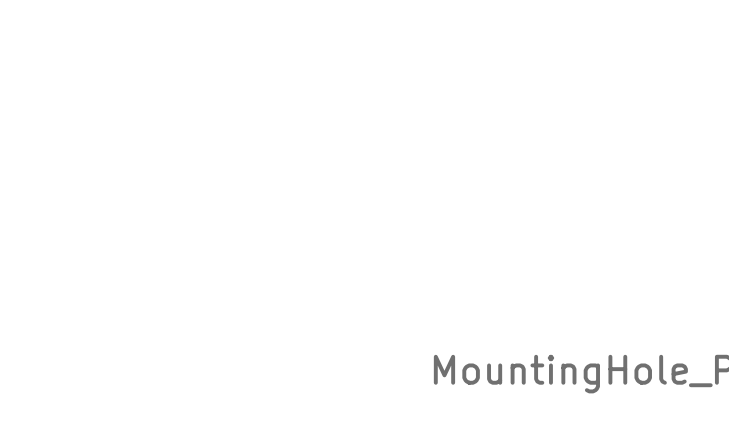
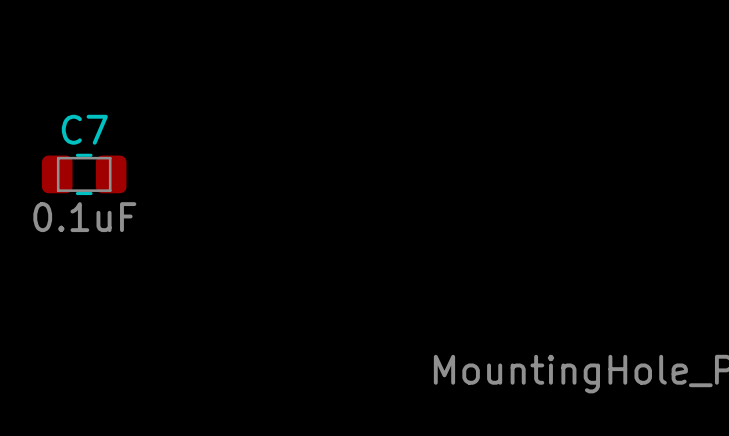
C7: none -> 0.1uF (84, 174)

